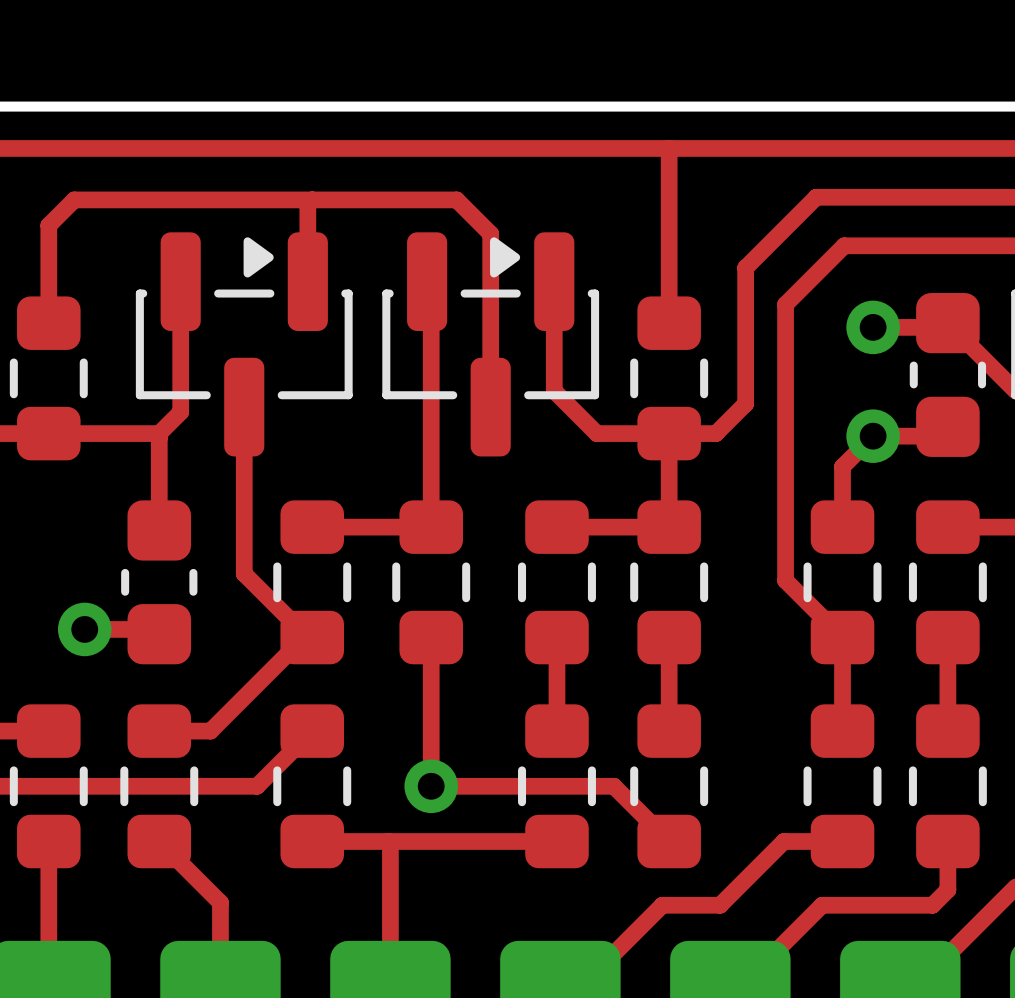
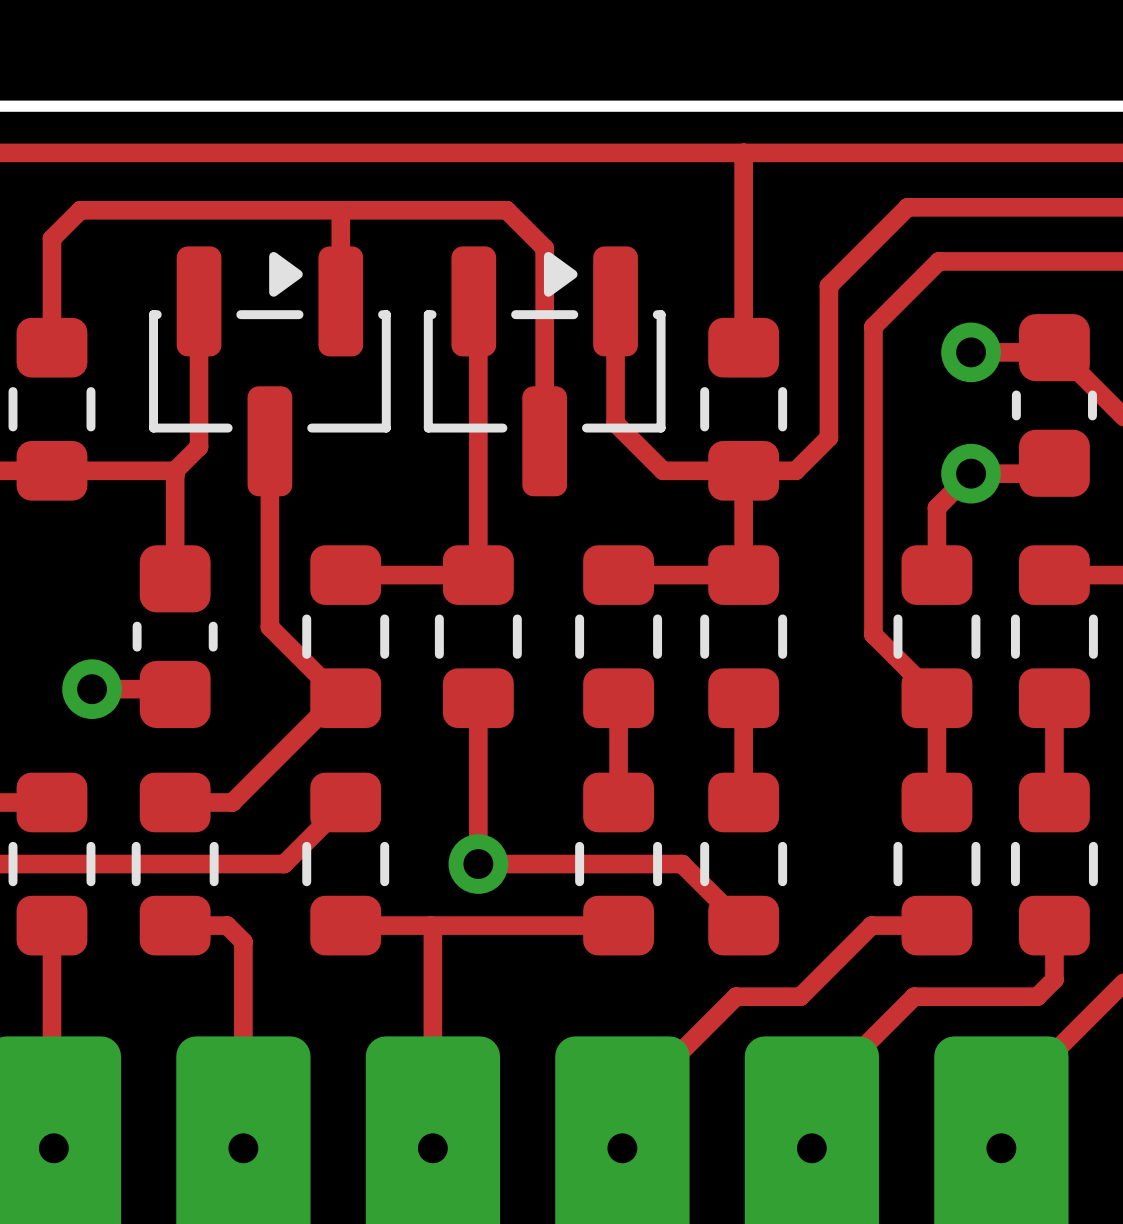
track: (159, 841) (220, 902) -> (175, 925) (227, 925) (243, 941) (243, 993)

